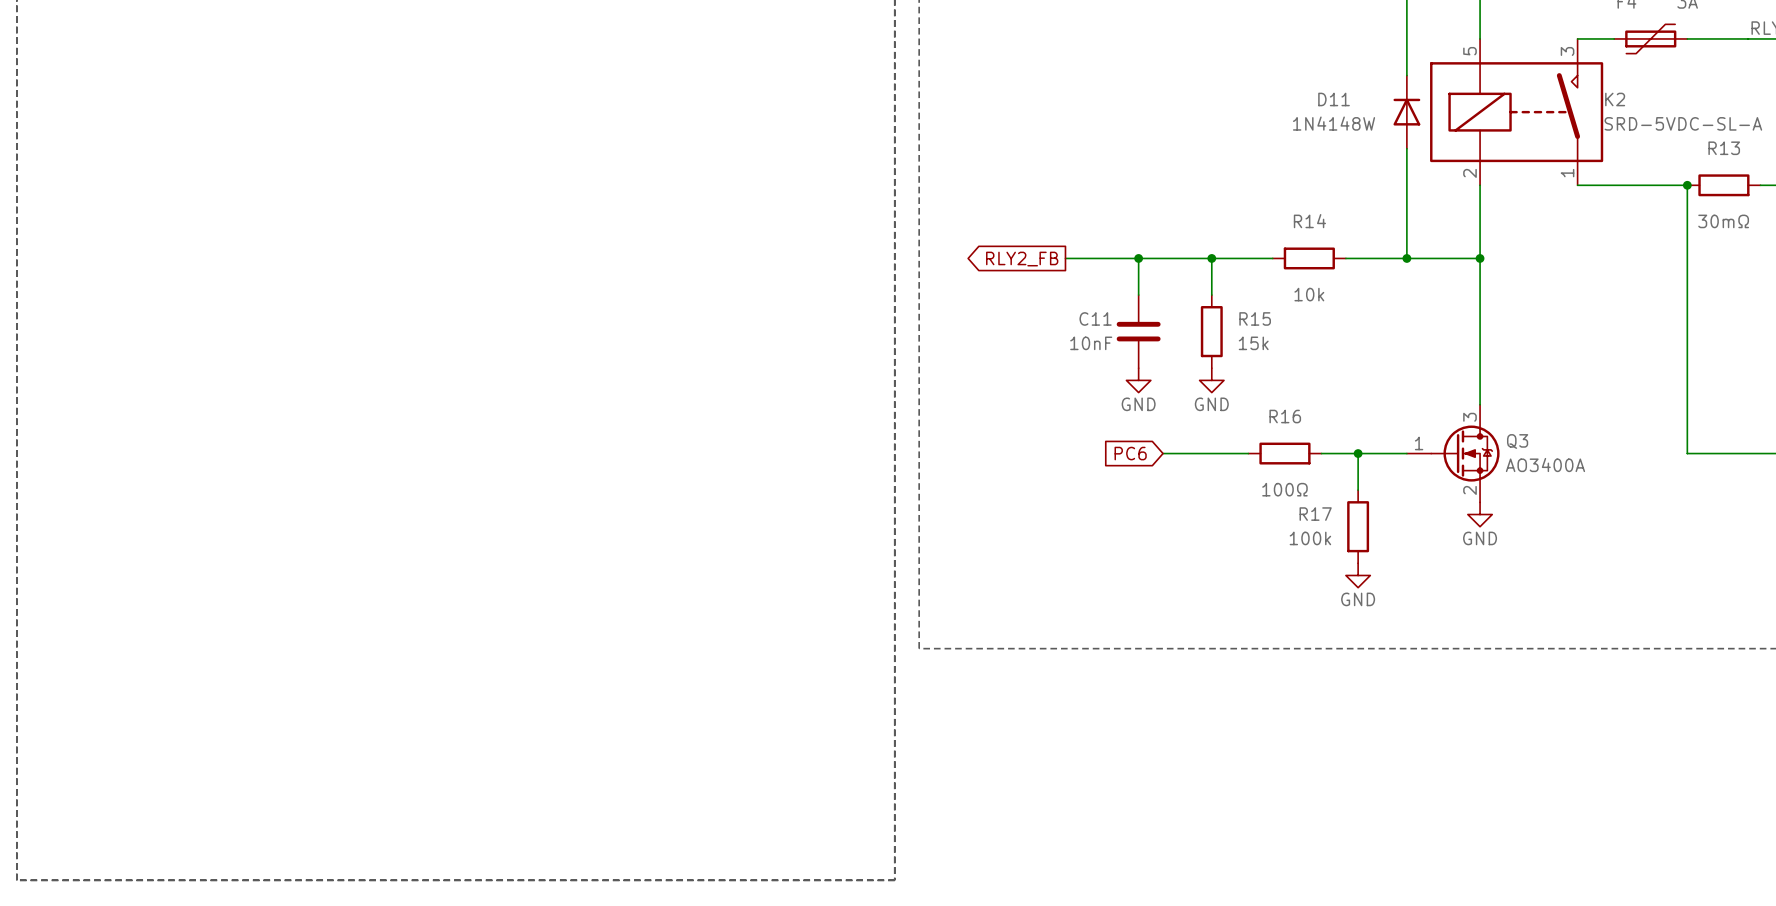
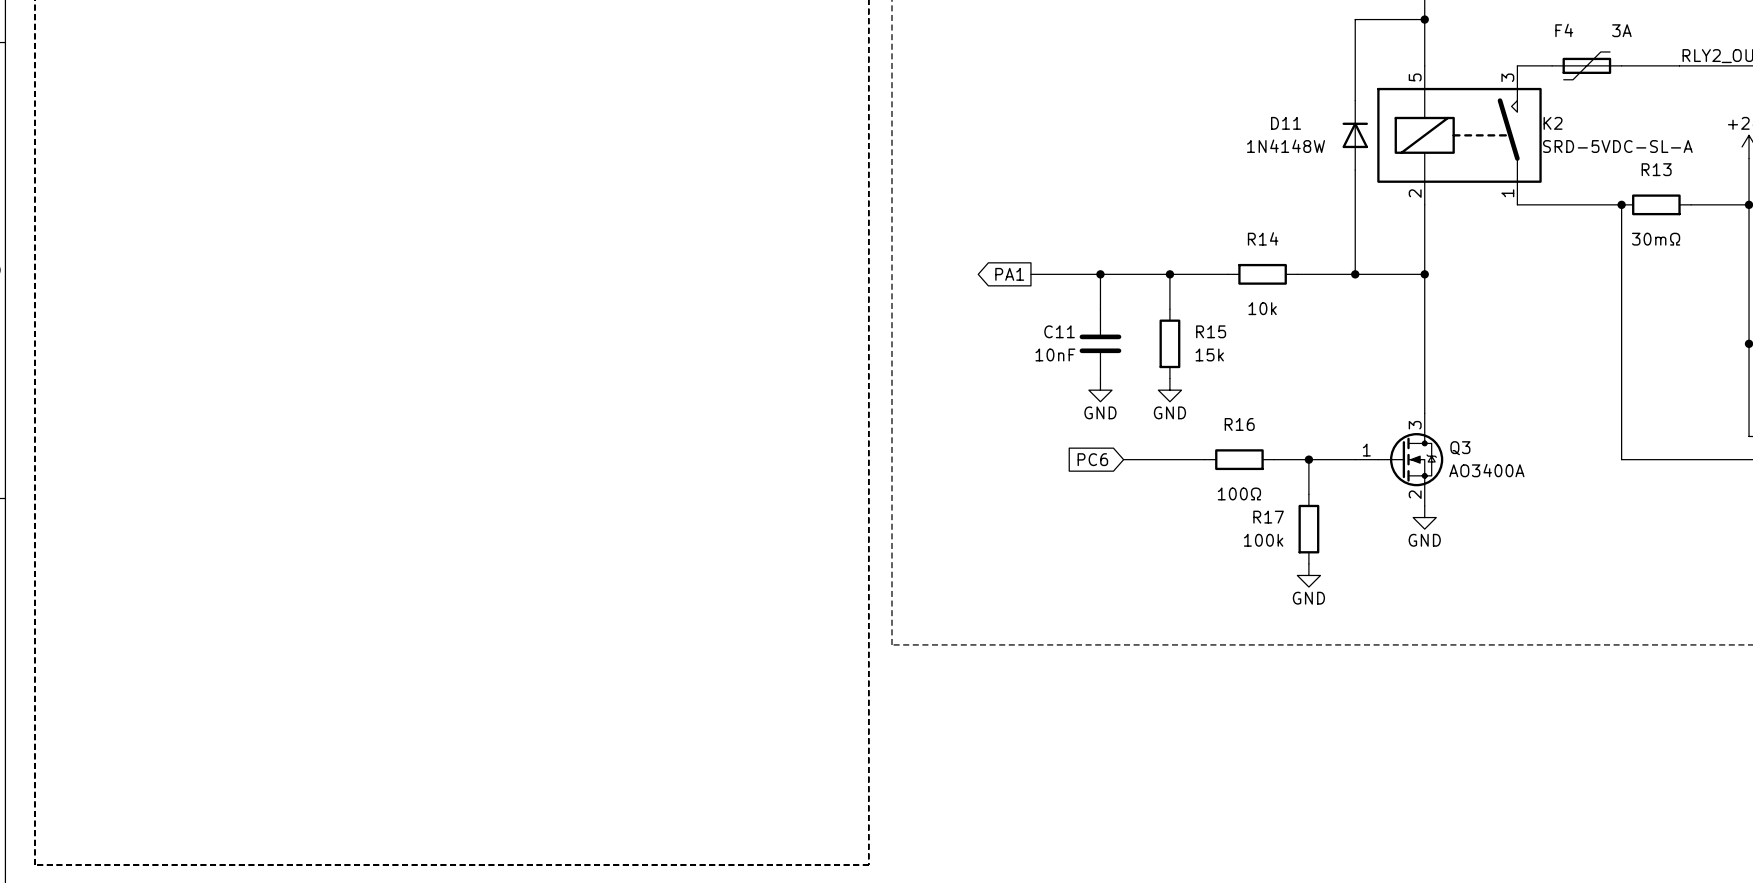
global label: RLY2_FB (1022, 259) -> PA1 (1009, 274)

